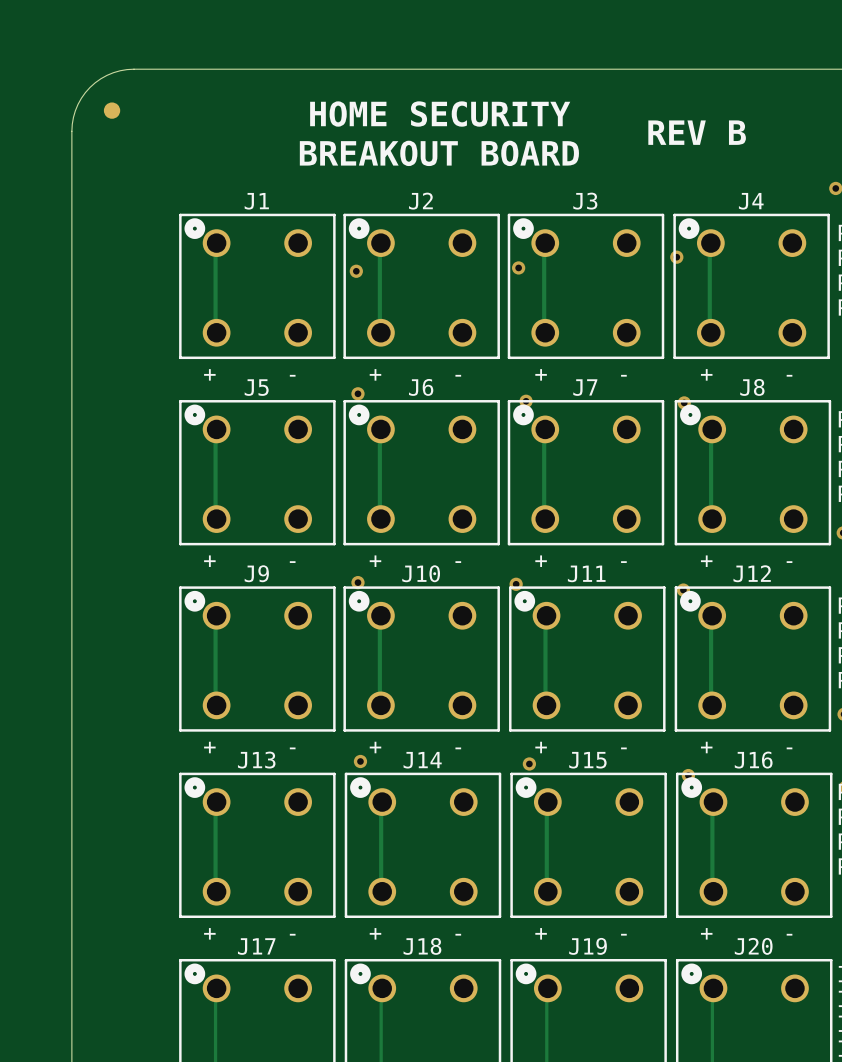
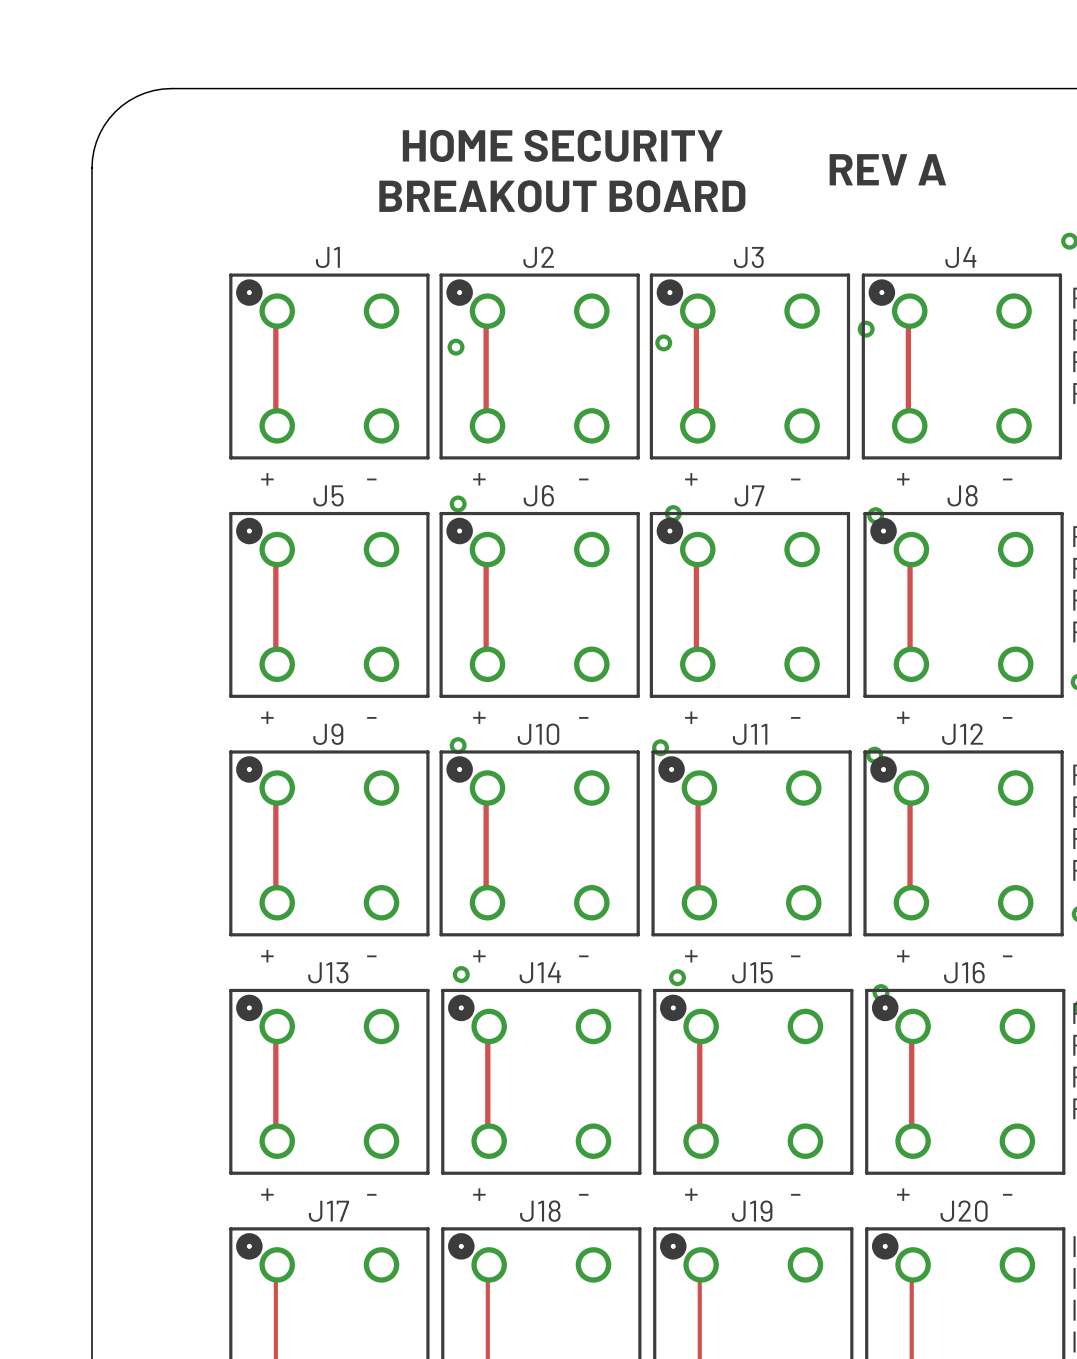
part: (112, 110) -> none
text: REV B (697, 132) -> REV A (887, 169)

